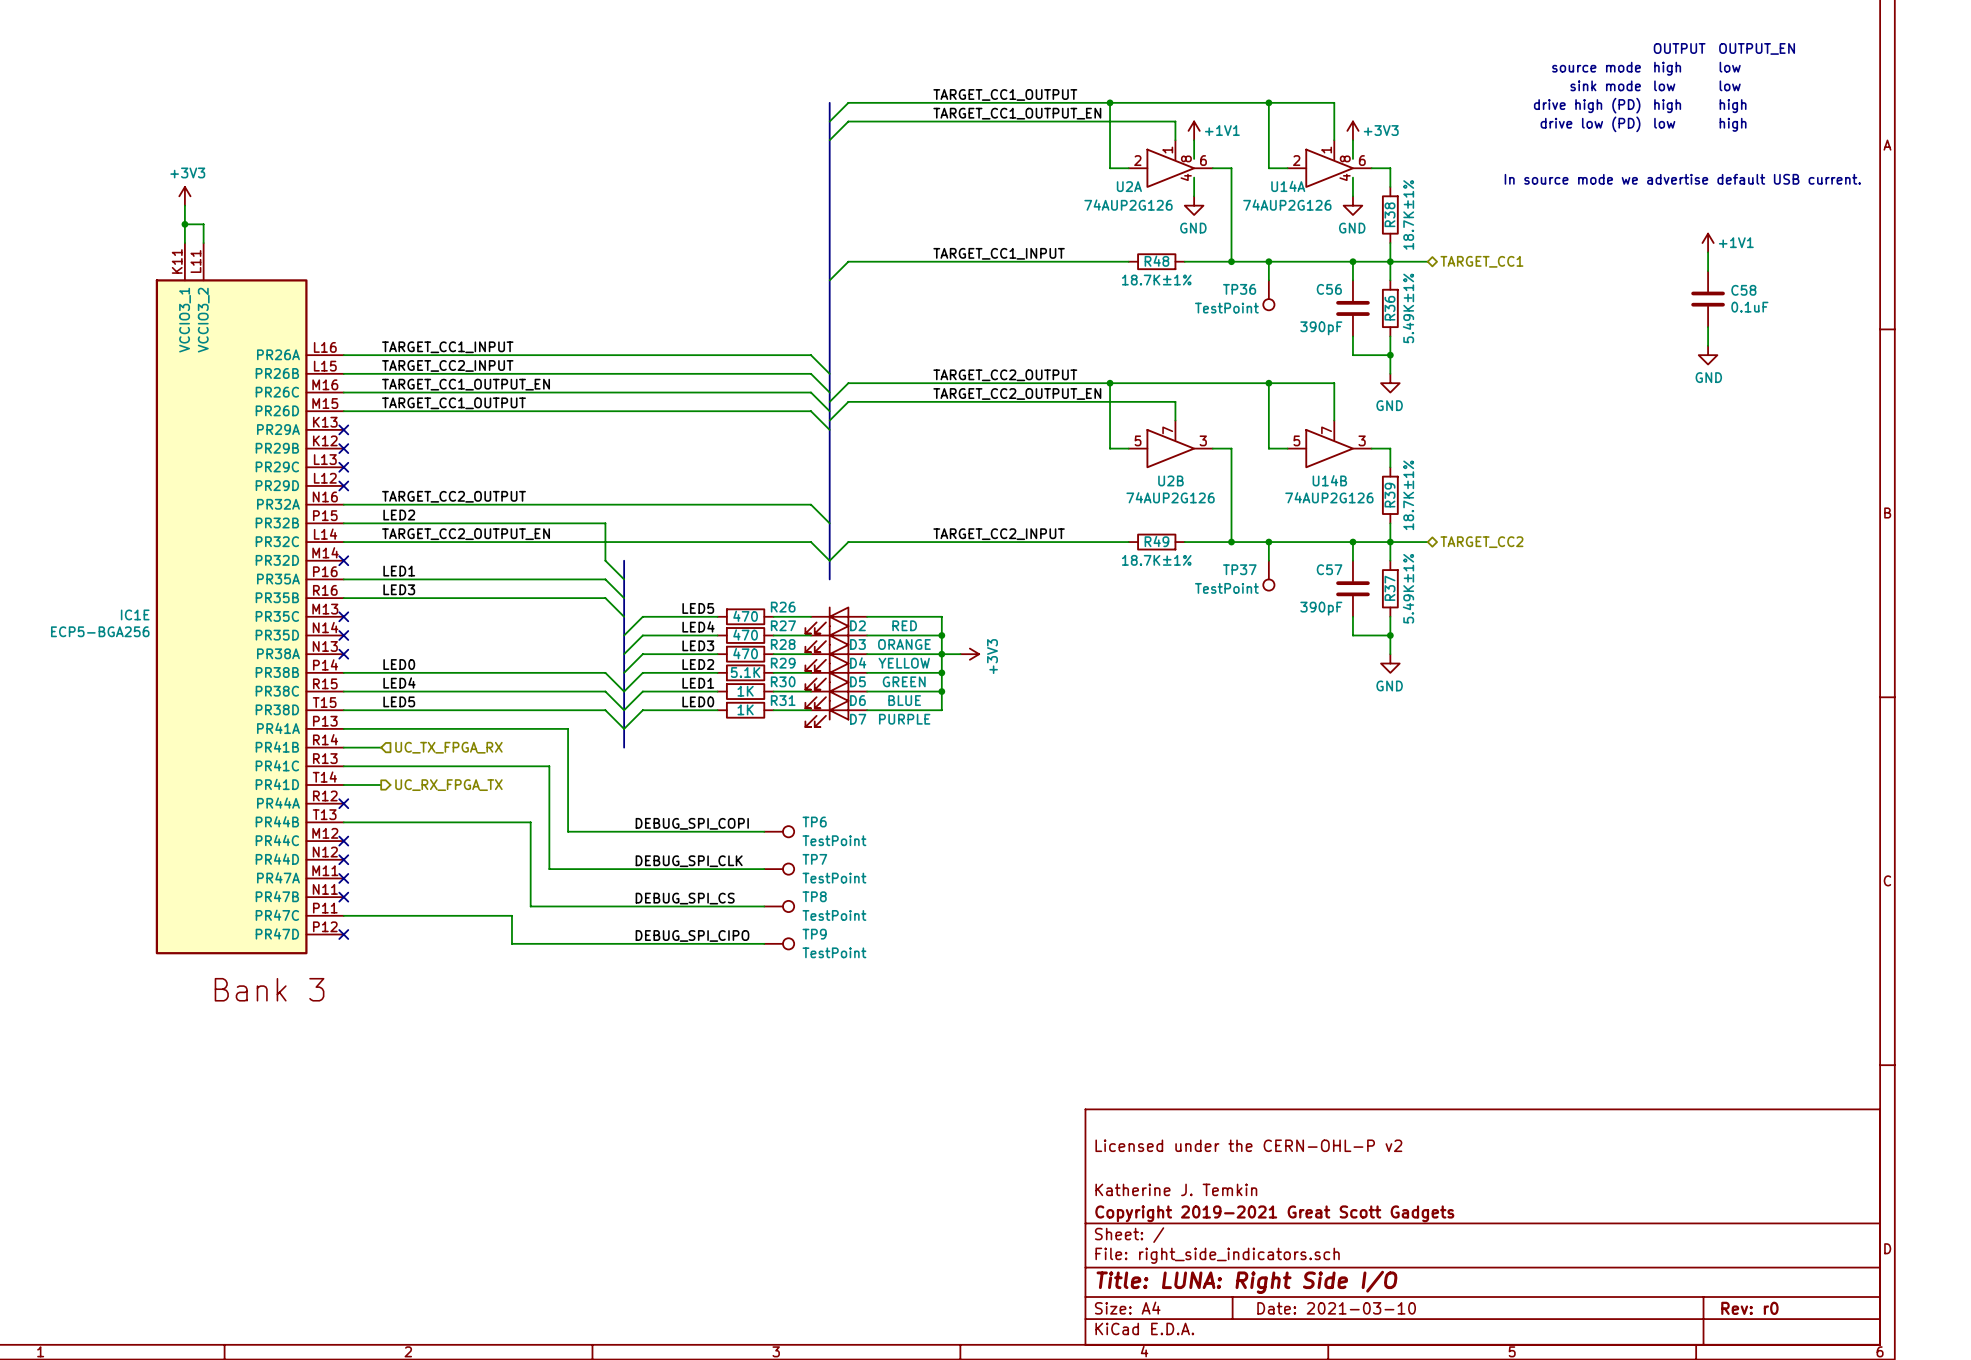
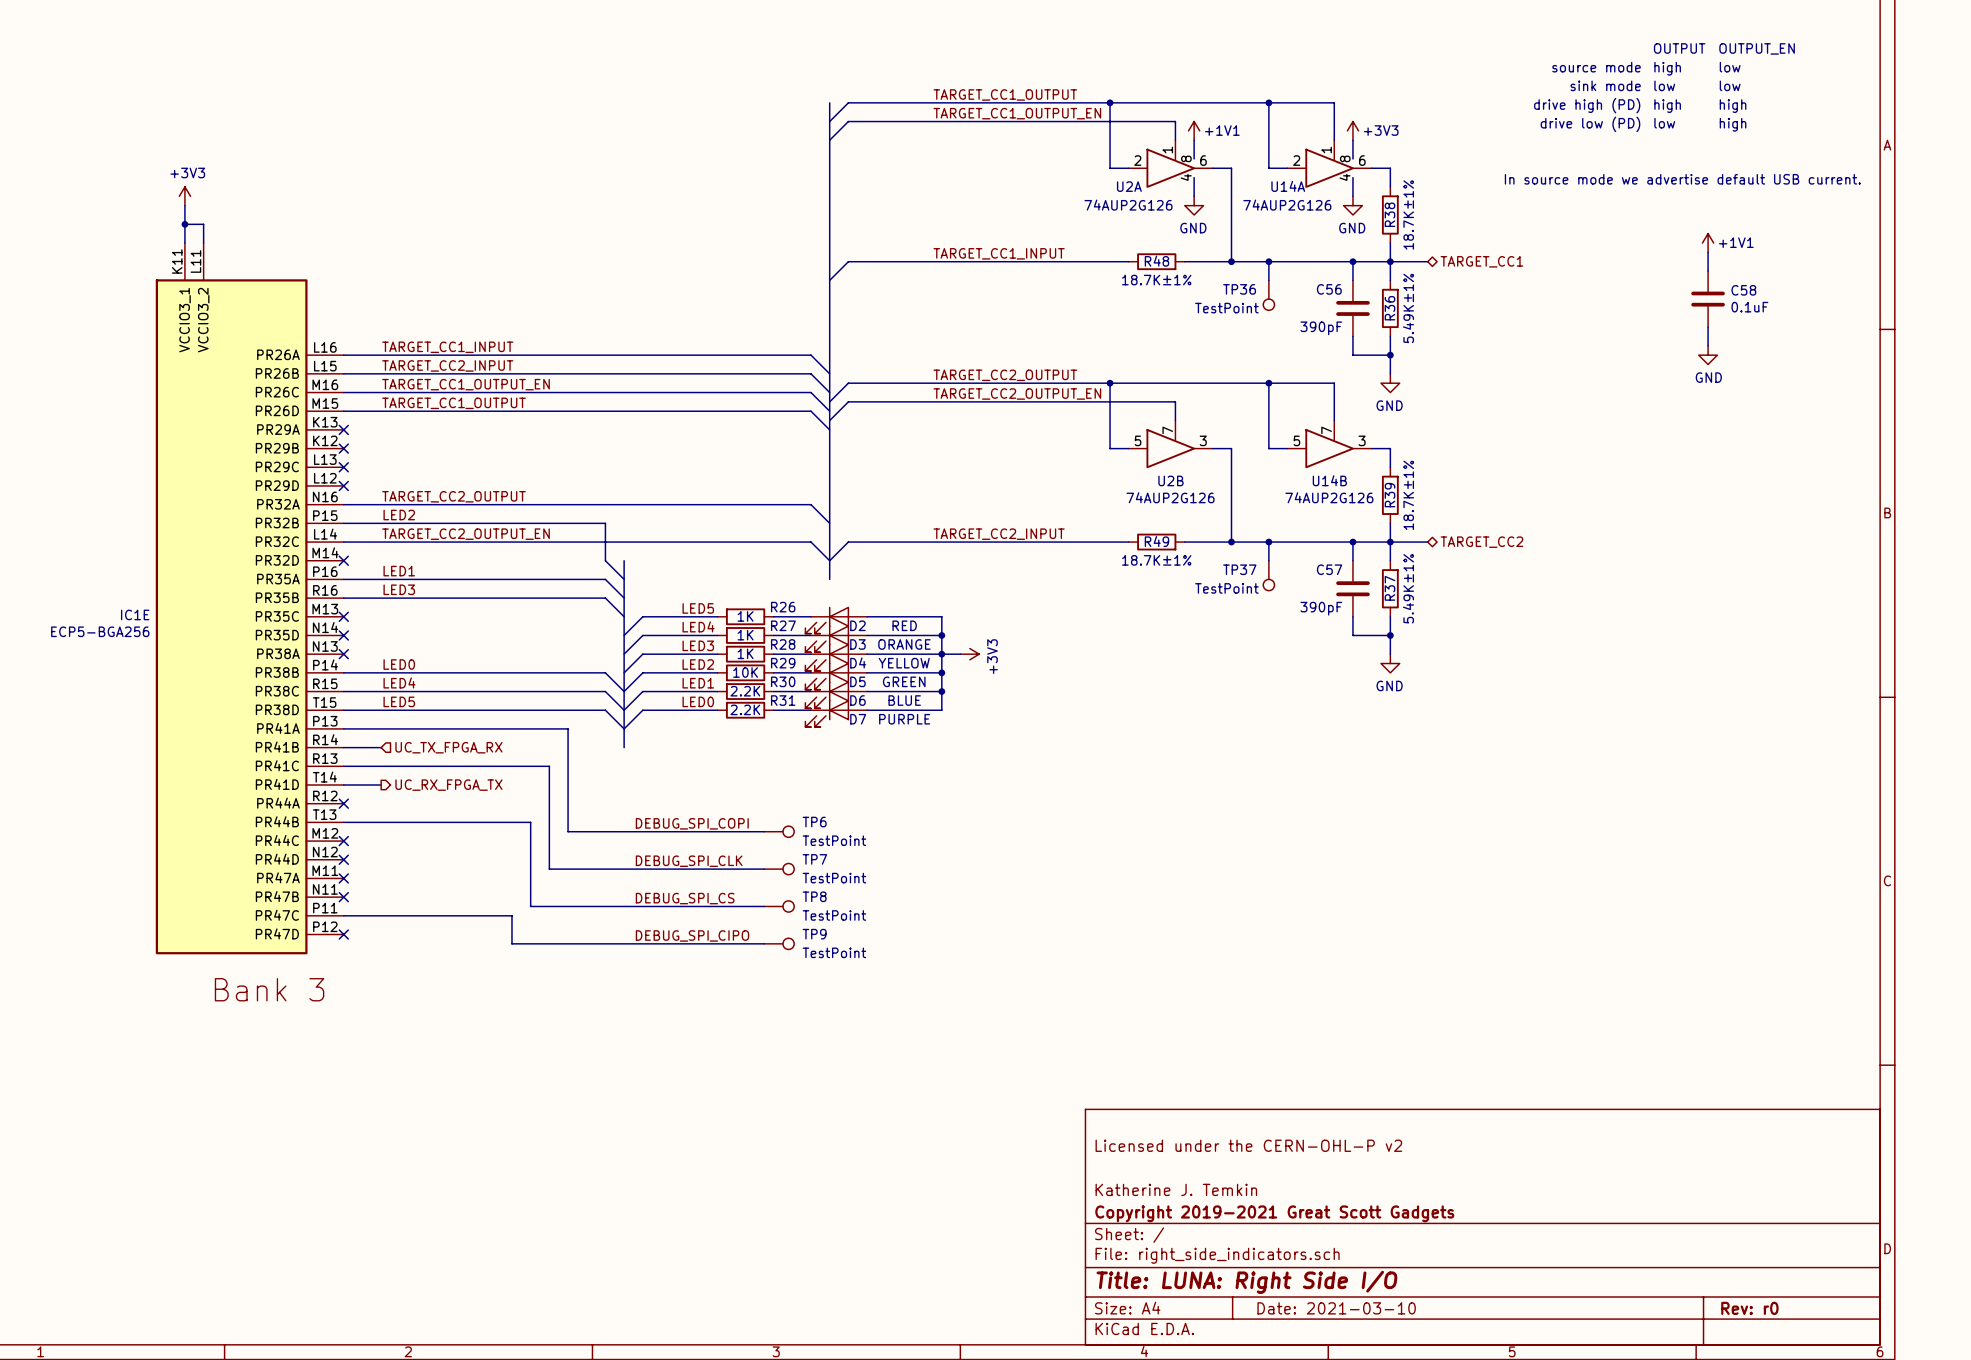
R26 value: 470 (745, 616) -> 1K (745, 616)
R27 value: 470 (745, 634) -> 1K (745, 635)
R28 value: 470 (745, 653) -> 1K (745, 653)
R29 value: 5.1K (745, 672) -> 10K (745, 672)
R30 value: 1K (745, 691) -> 2.2K (745, 691)
R31 value: 1K (745, 709) -> 2.2K (745, 709)

